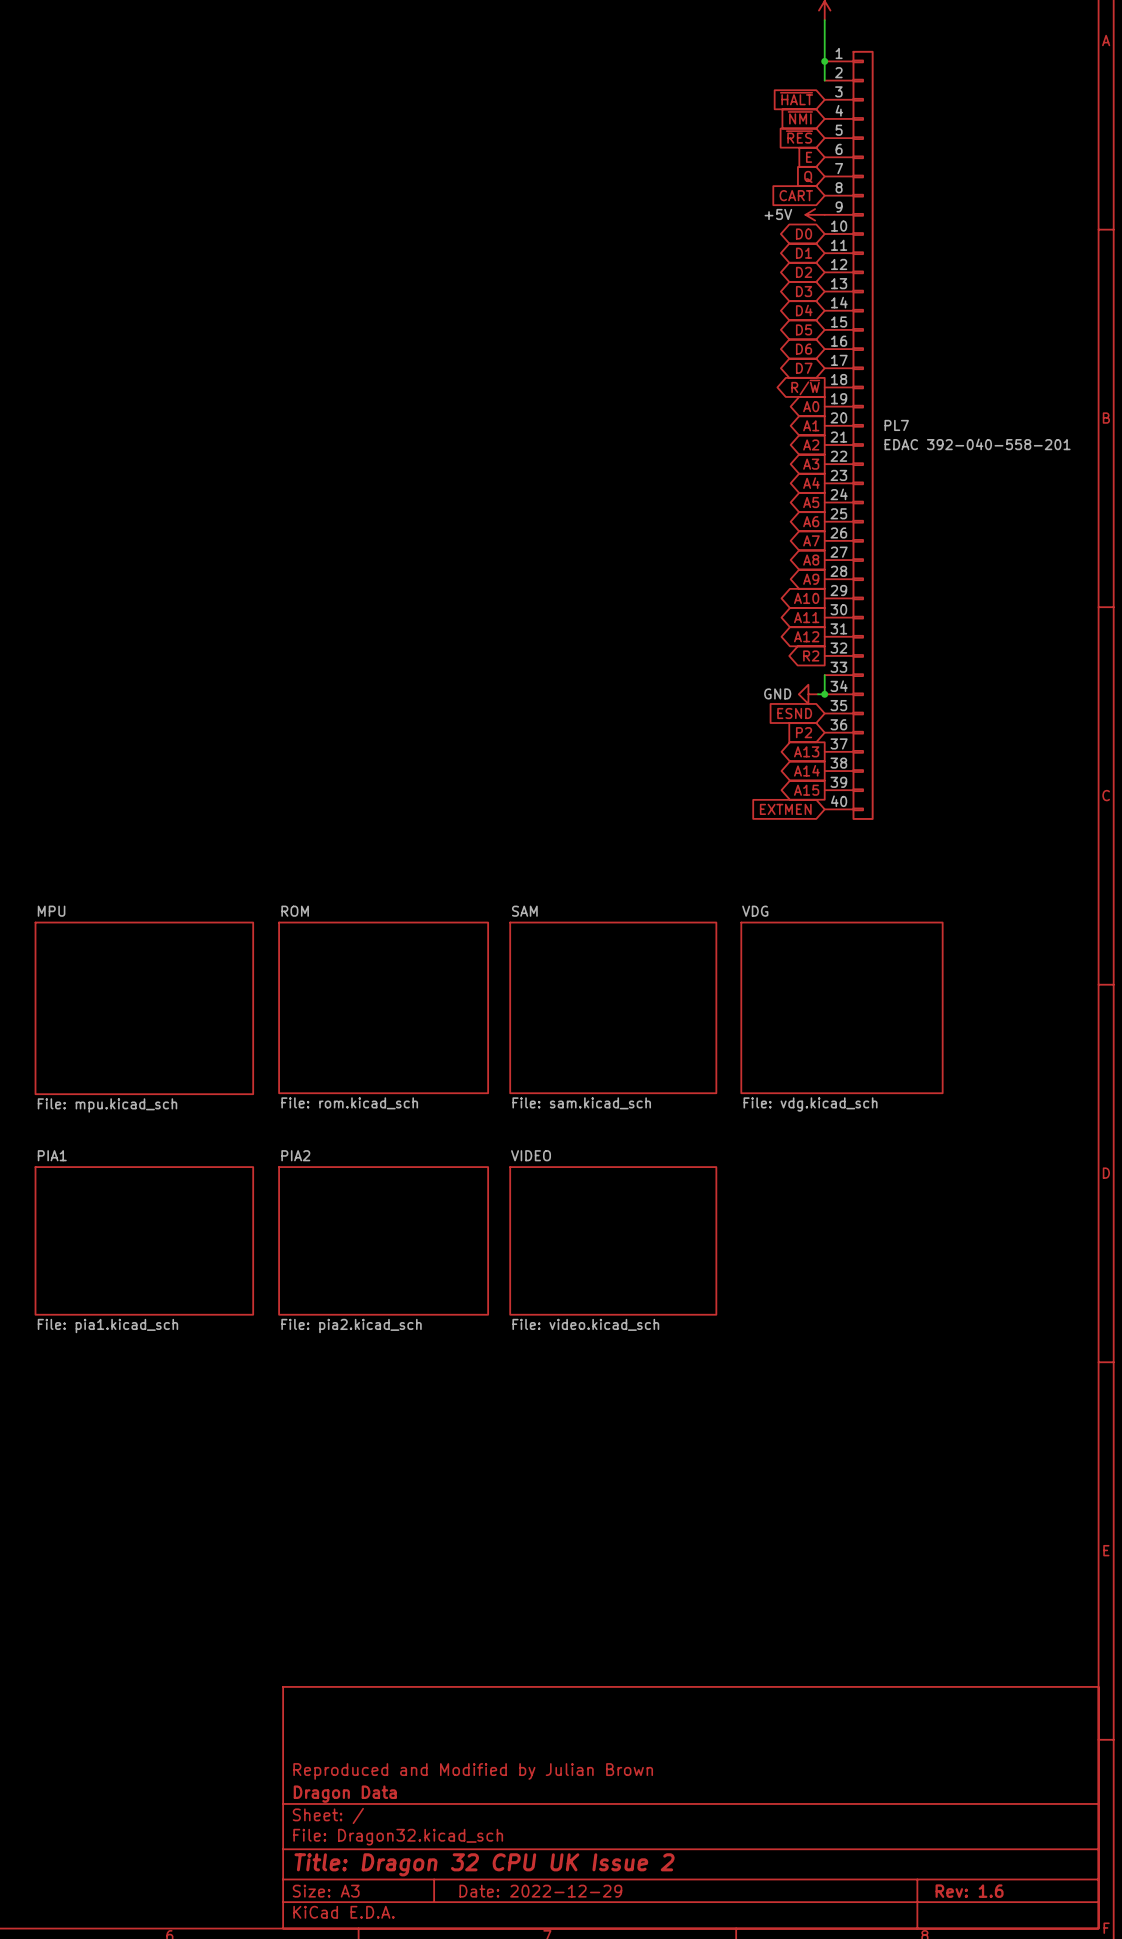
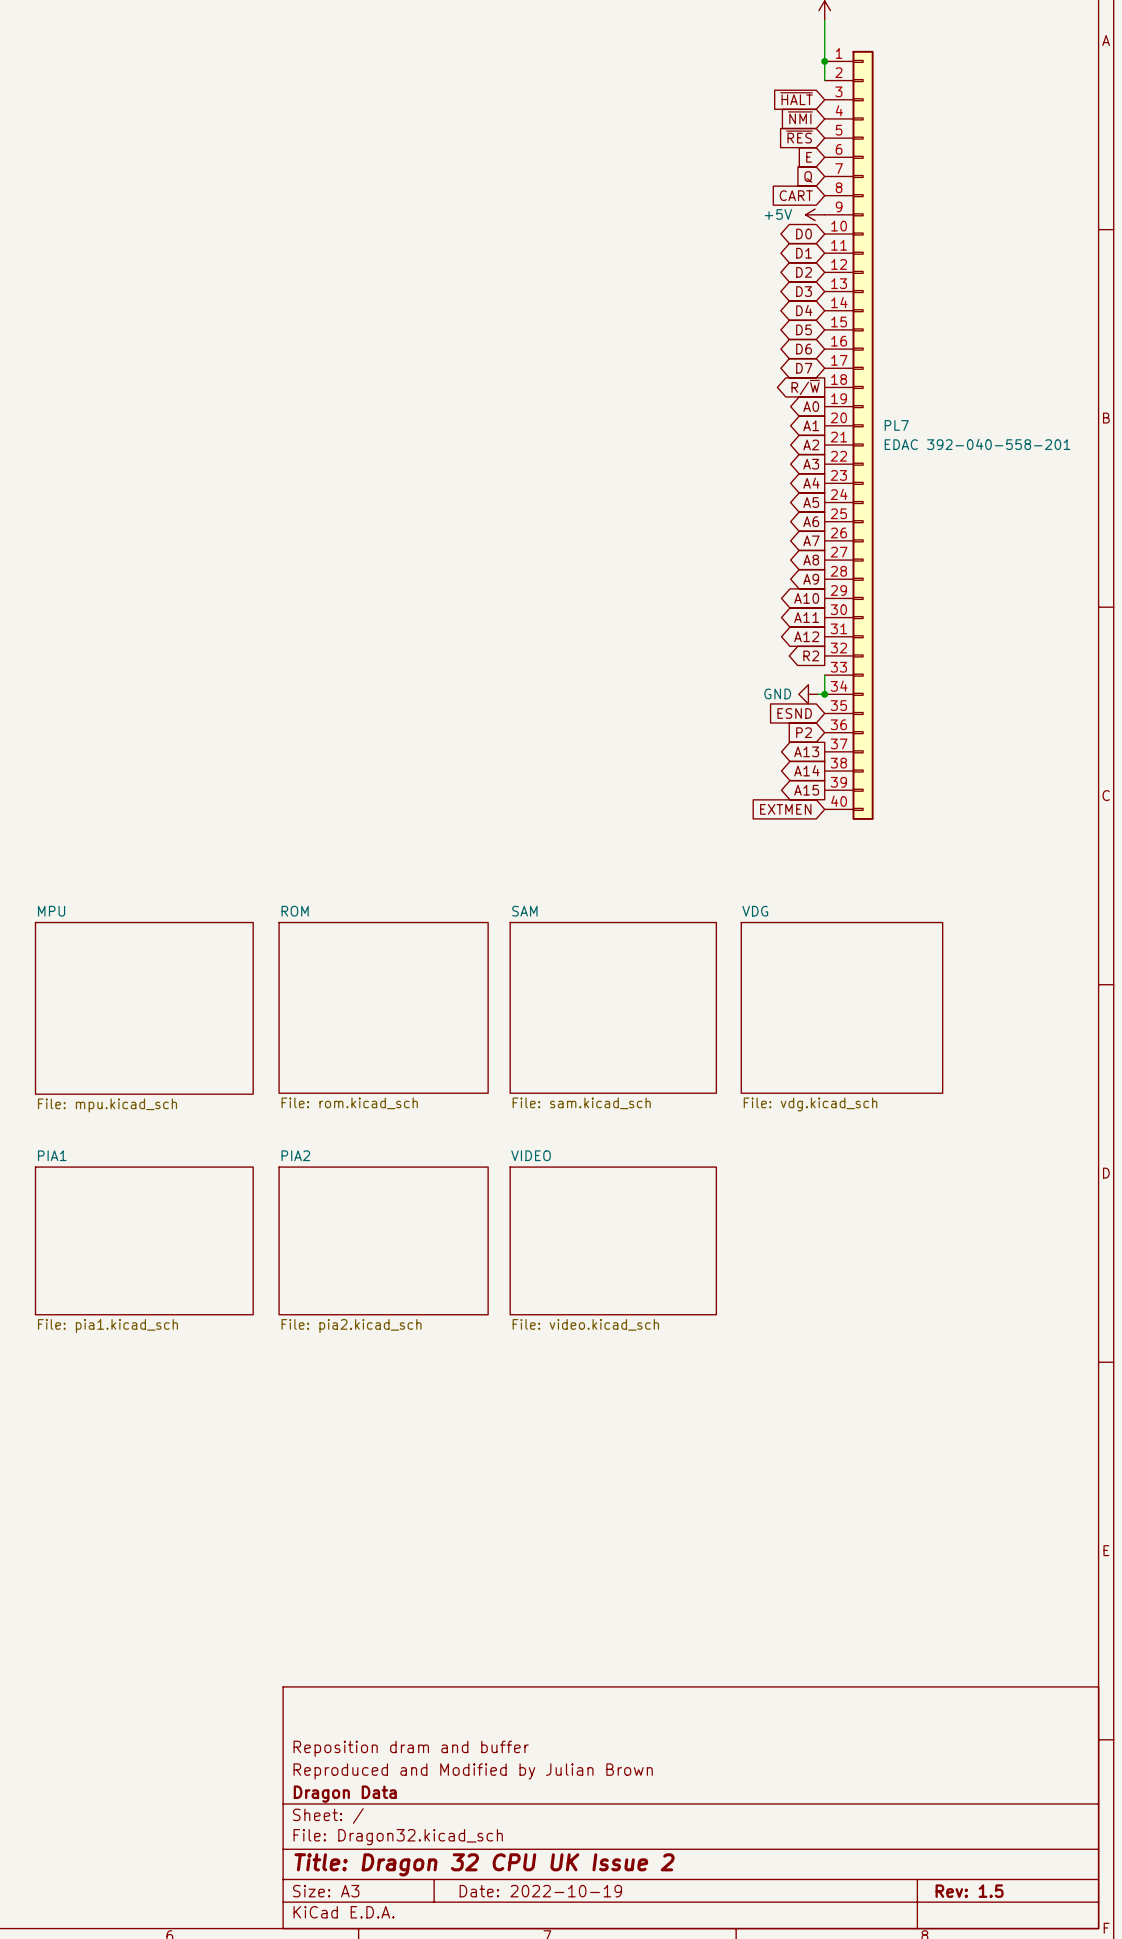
title block: none -> Reposition dram and buffer (411, 1748)
title block: Date: 2022-12-29 (540, 1891) -> Date: 2022-10-19 (540, 1891)
title block: Rev: 1.6 (969, 1891) -> Rev: 1.5 (969, 1891)

